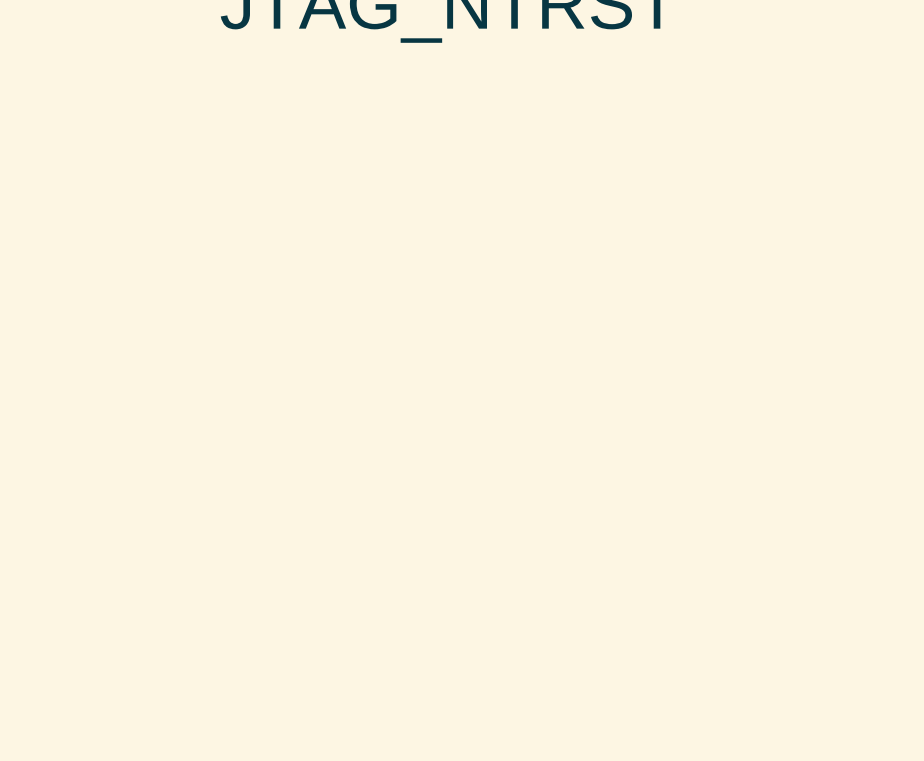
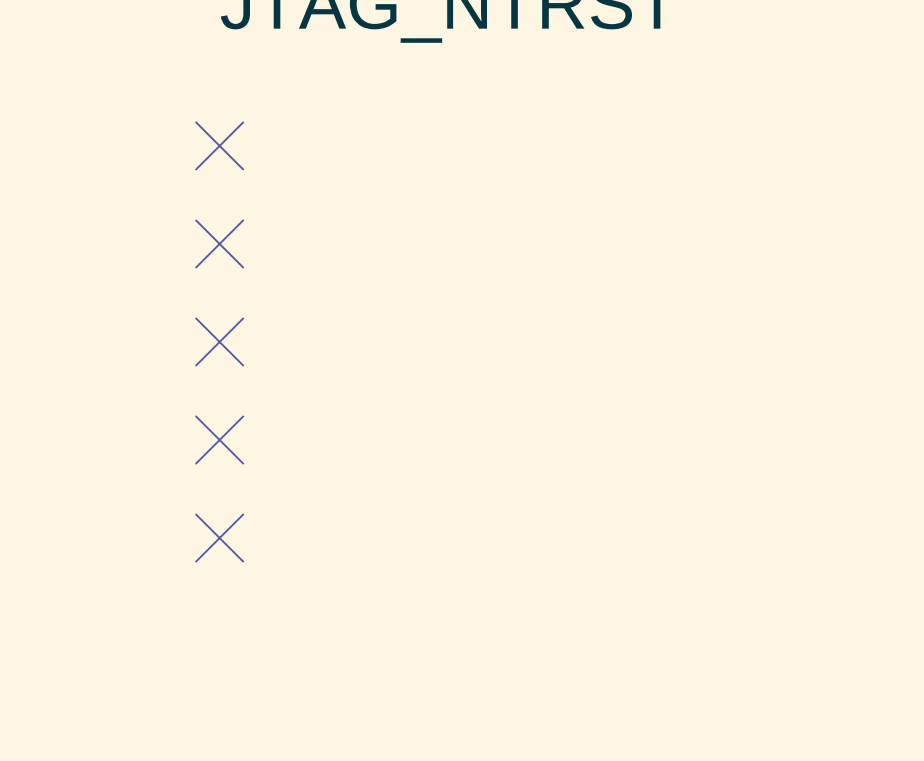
no-connect mark: none -> (219, 145)
no-connect mark: none -> (219, 243)
no-connect mark: none -> (219, 341)
no-connect mark: none -> (219, 440)
no-connect mark: none -> (219, 538)

